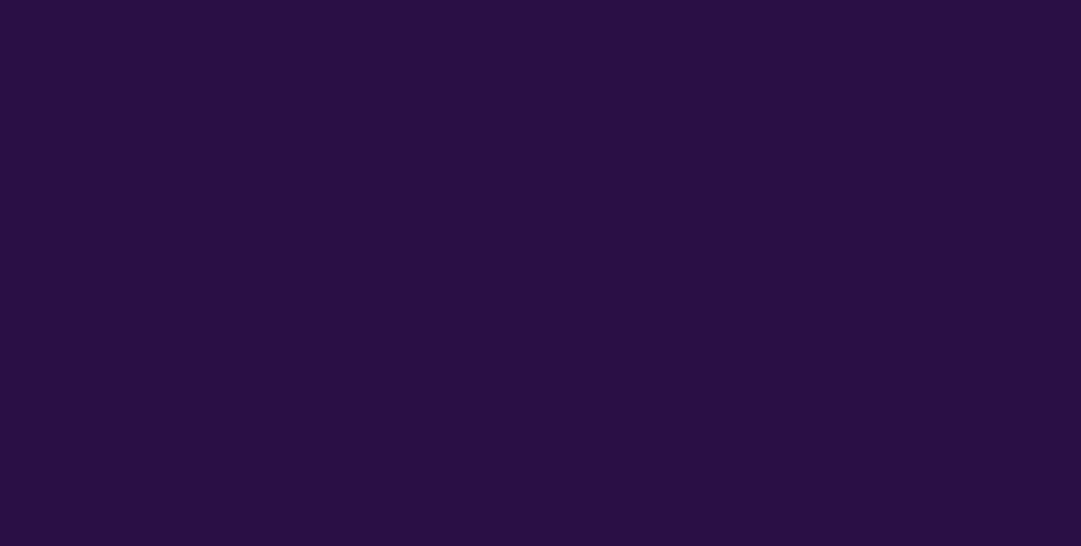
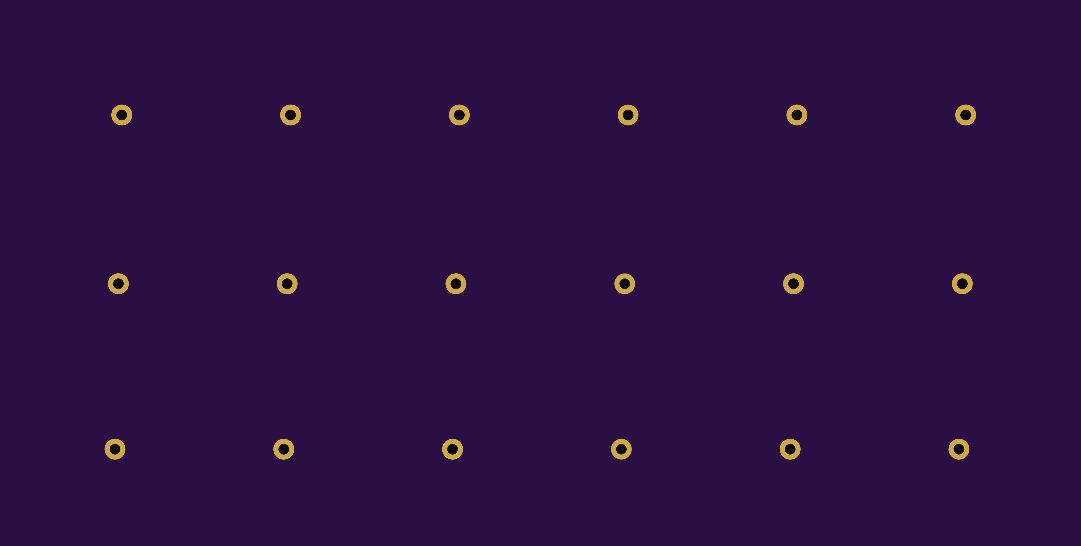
via: none -> (121, 114)
via: none -> (290, 114)
via: none -> (459, 114)
via: none -> (628, 114)
via: none -> (796, 114)
via: none -> (965, 114)
via: none -> (118, 283)
via: none -> (287, 283)
via: none -> (455, 283)
via: none -> (624, 283)
via: none -> (793, 283)
via: none -> (962, 283)
via: none -> (114, 449)
via: none -> (283, 449)
via: none -> (452, 449)
via: none -> (621, 449)
via: none -> (790, 449)
via: none -> (958, 449)

